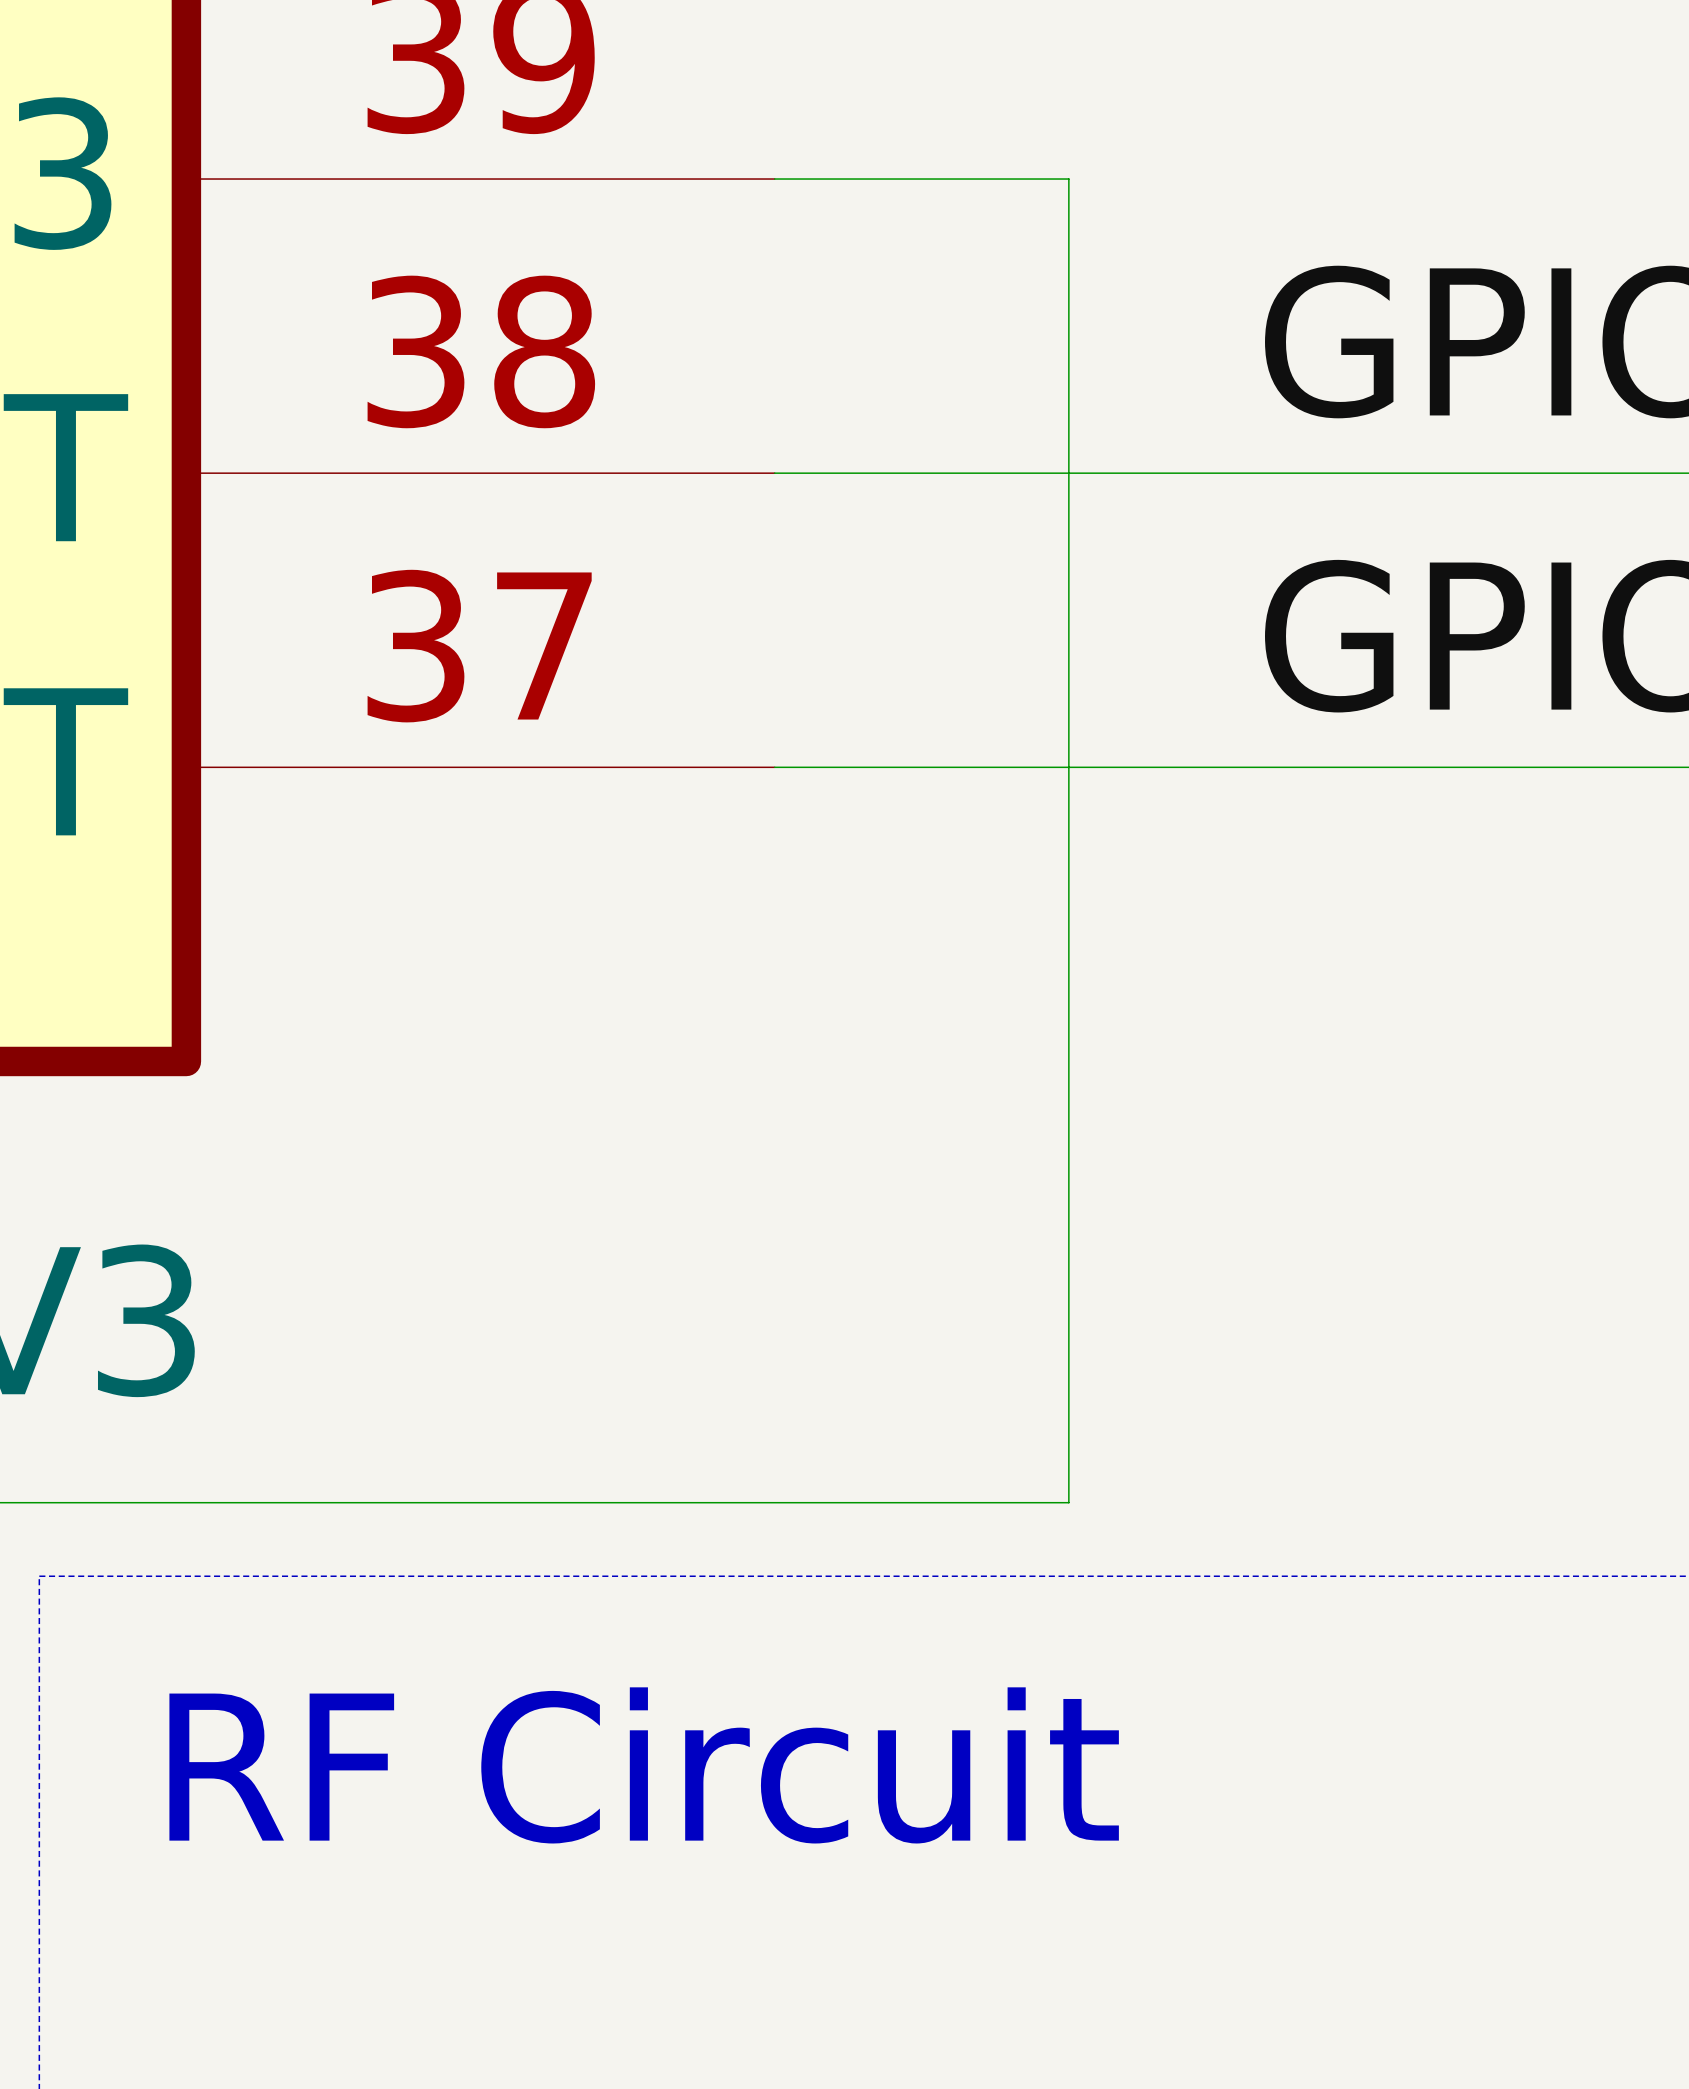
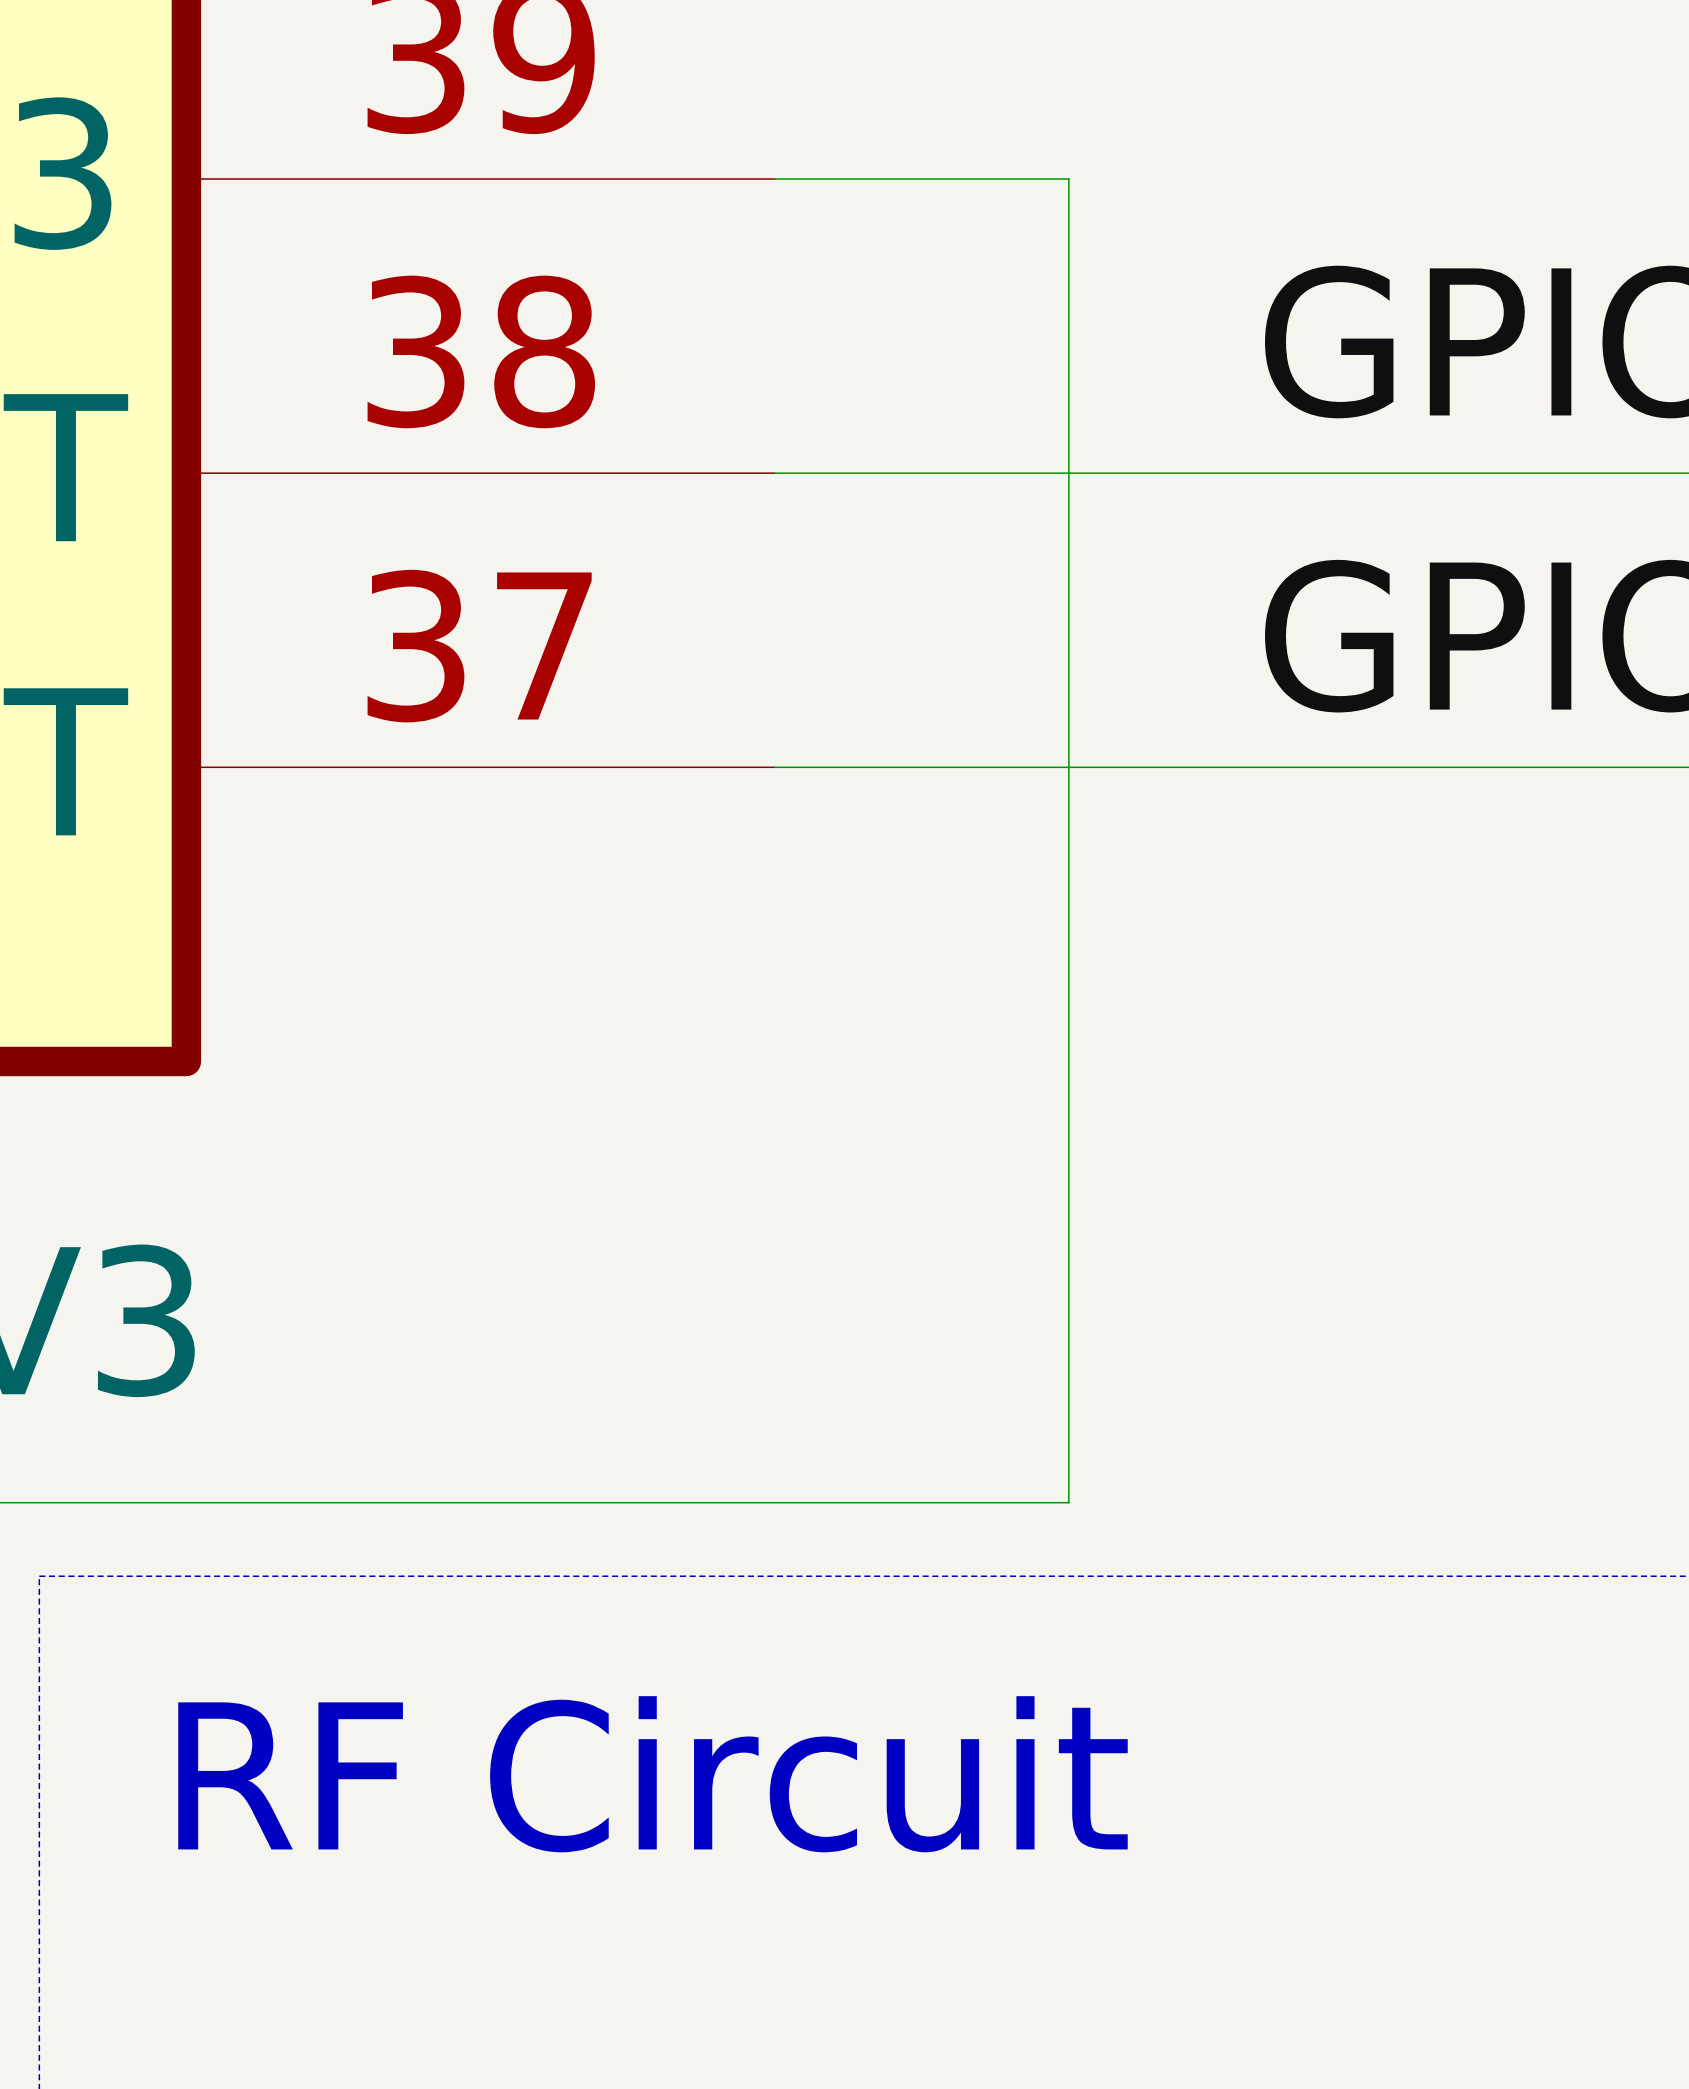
text position: RF Circuit (644, 1765) -> RF Circuit (652, 1774)

